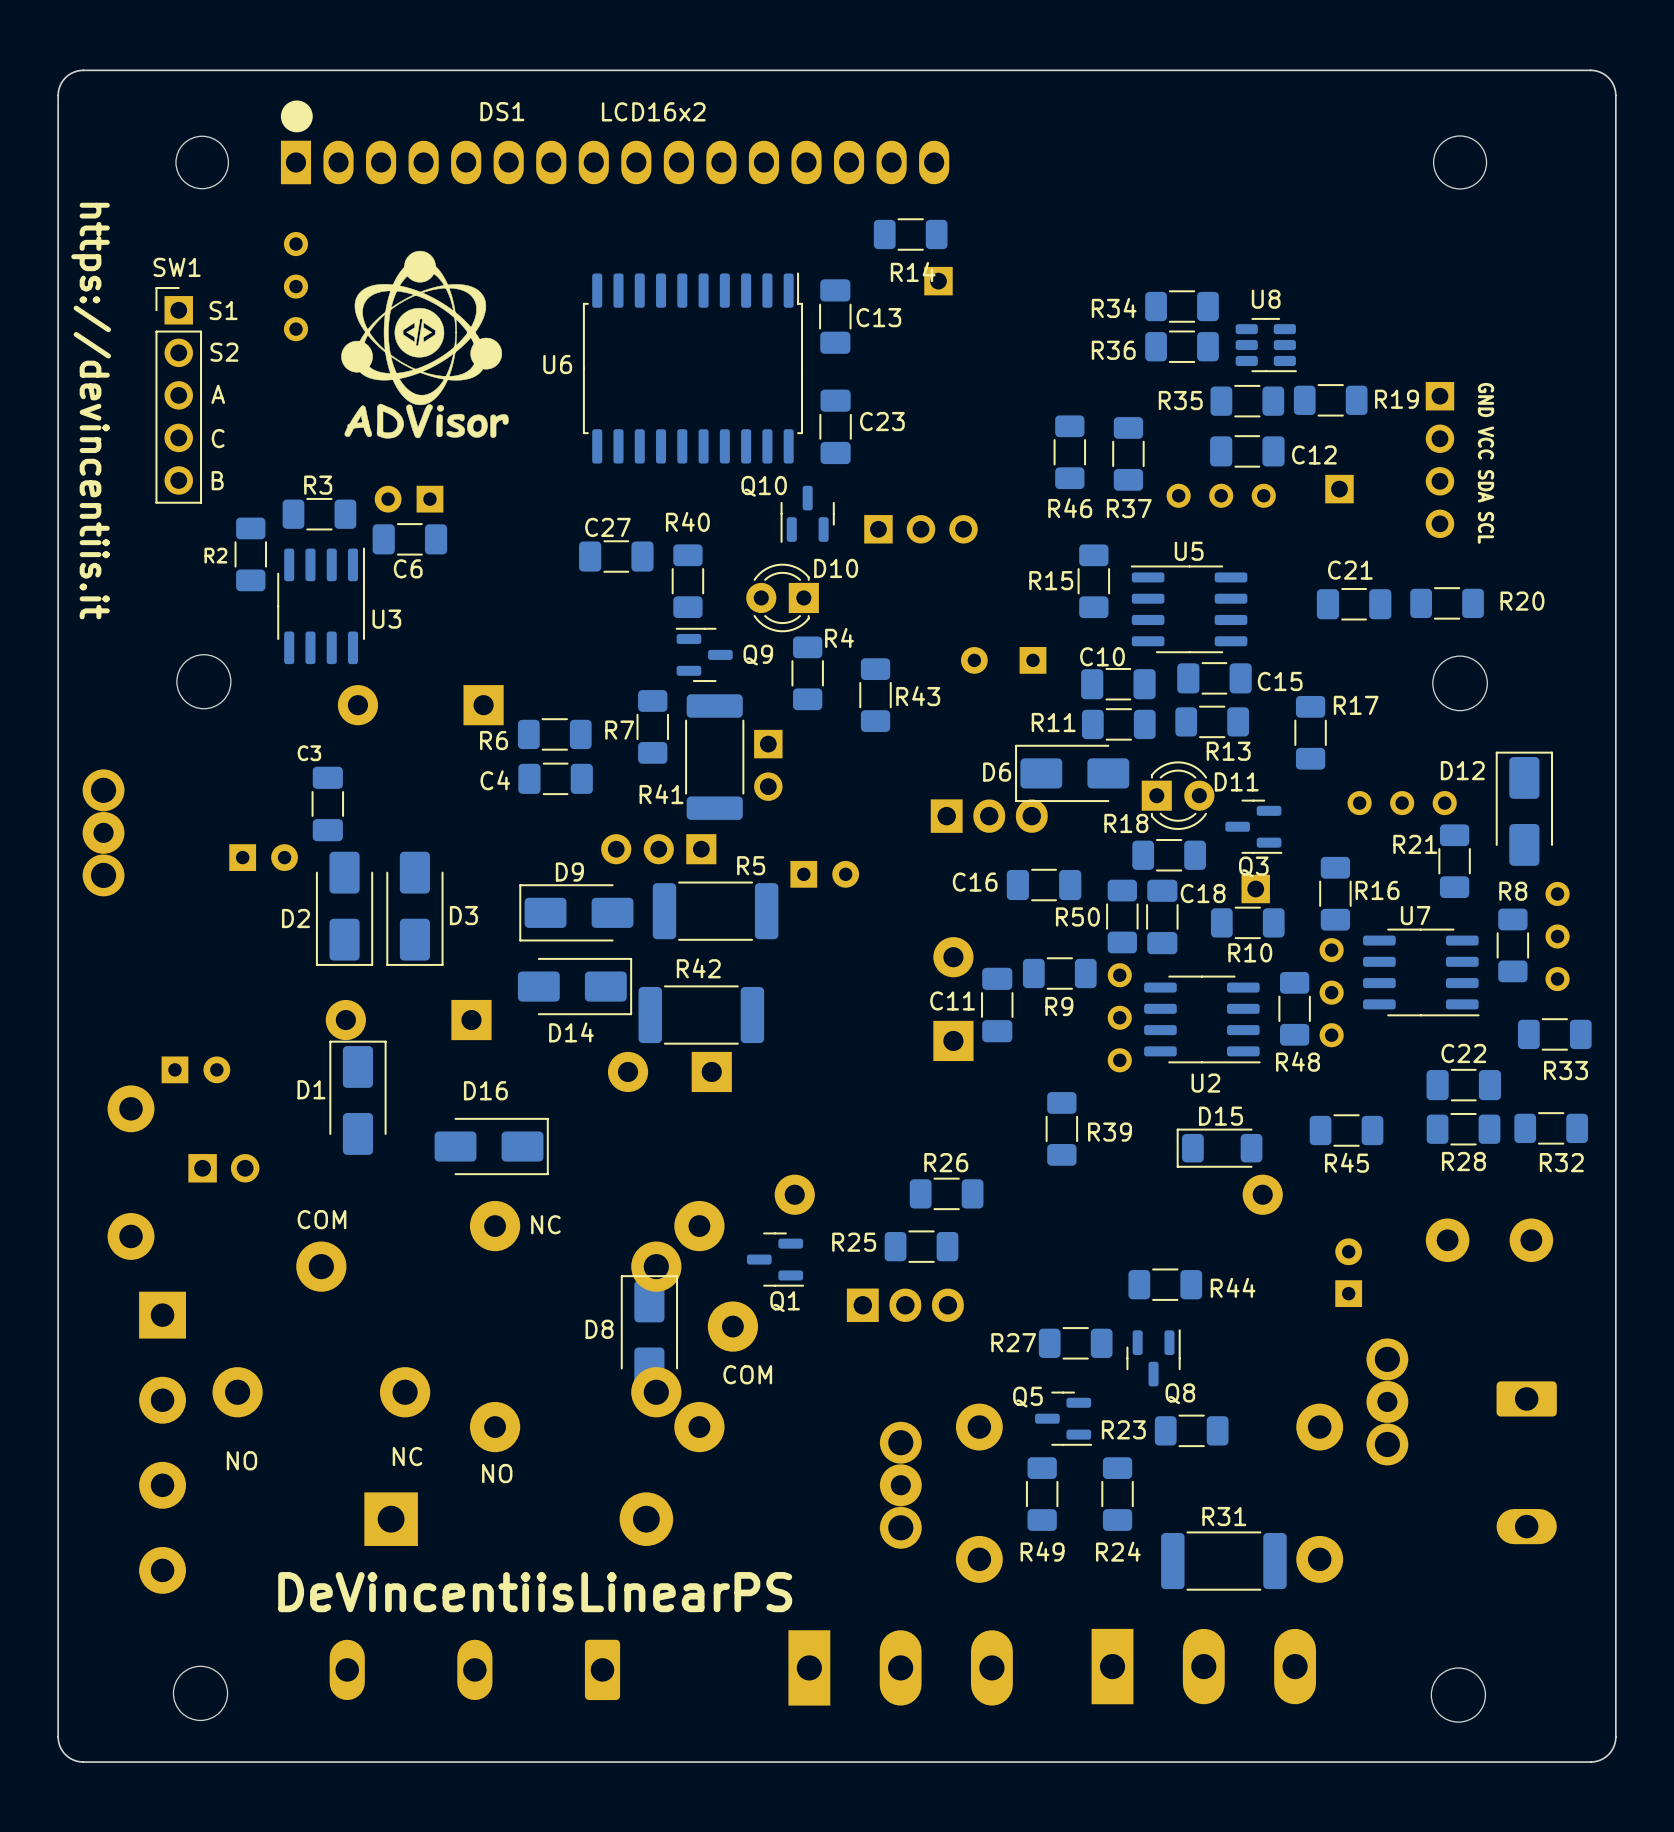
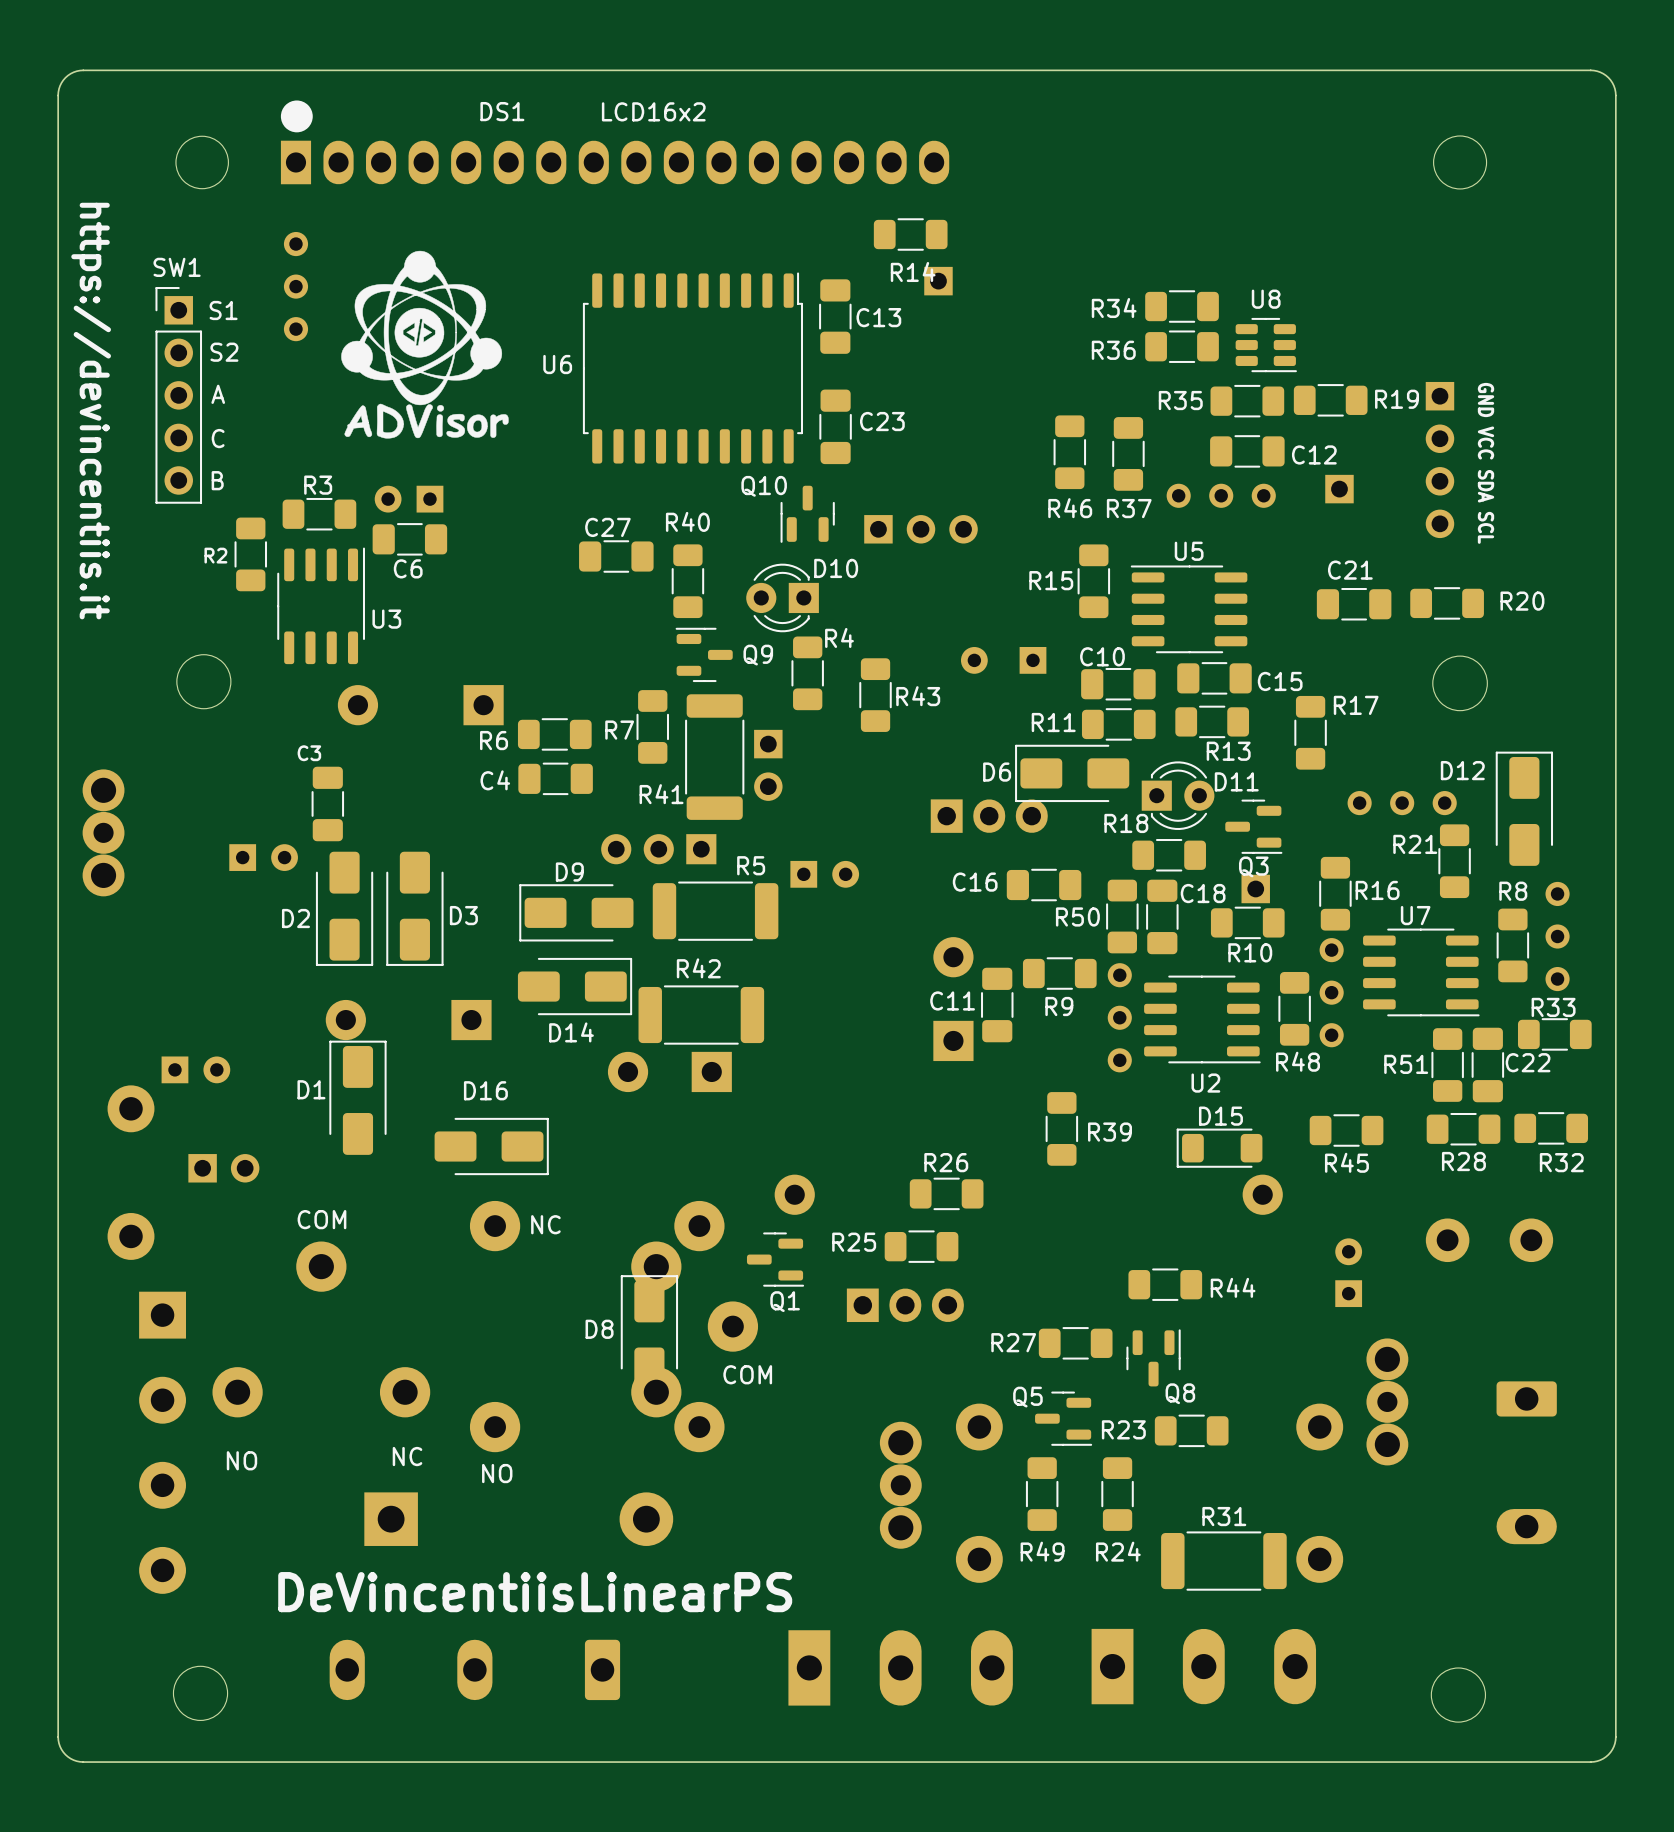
R51: none -> (1447, 1065)
R33 name position: R33 (1565, 1070) -> R33 (1553, 1007)
C22 rotation: 0° (1463, 1085) -> 90° clockwise (1487, 1065)

